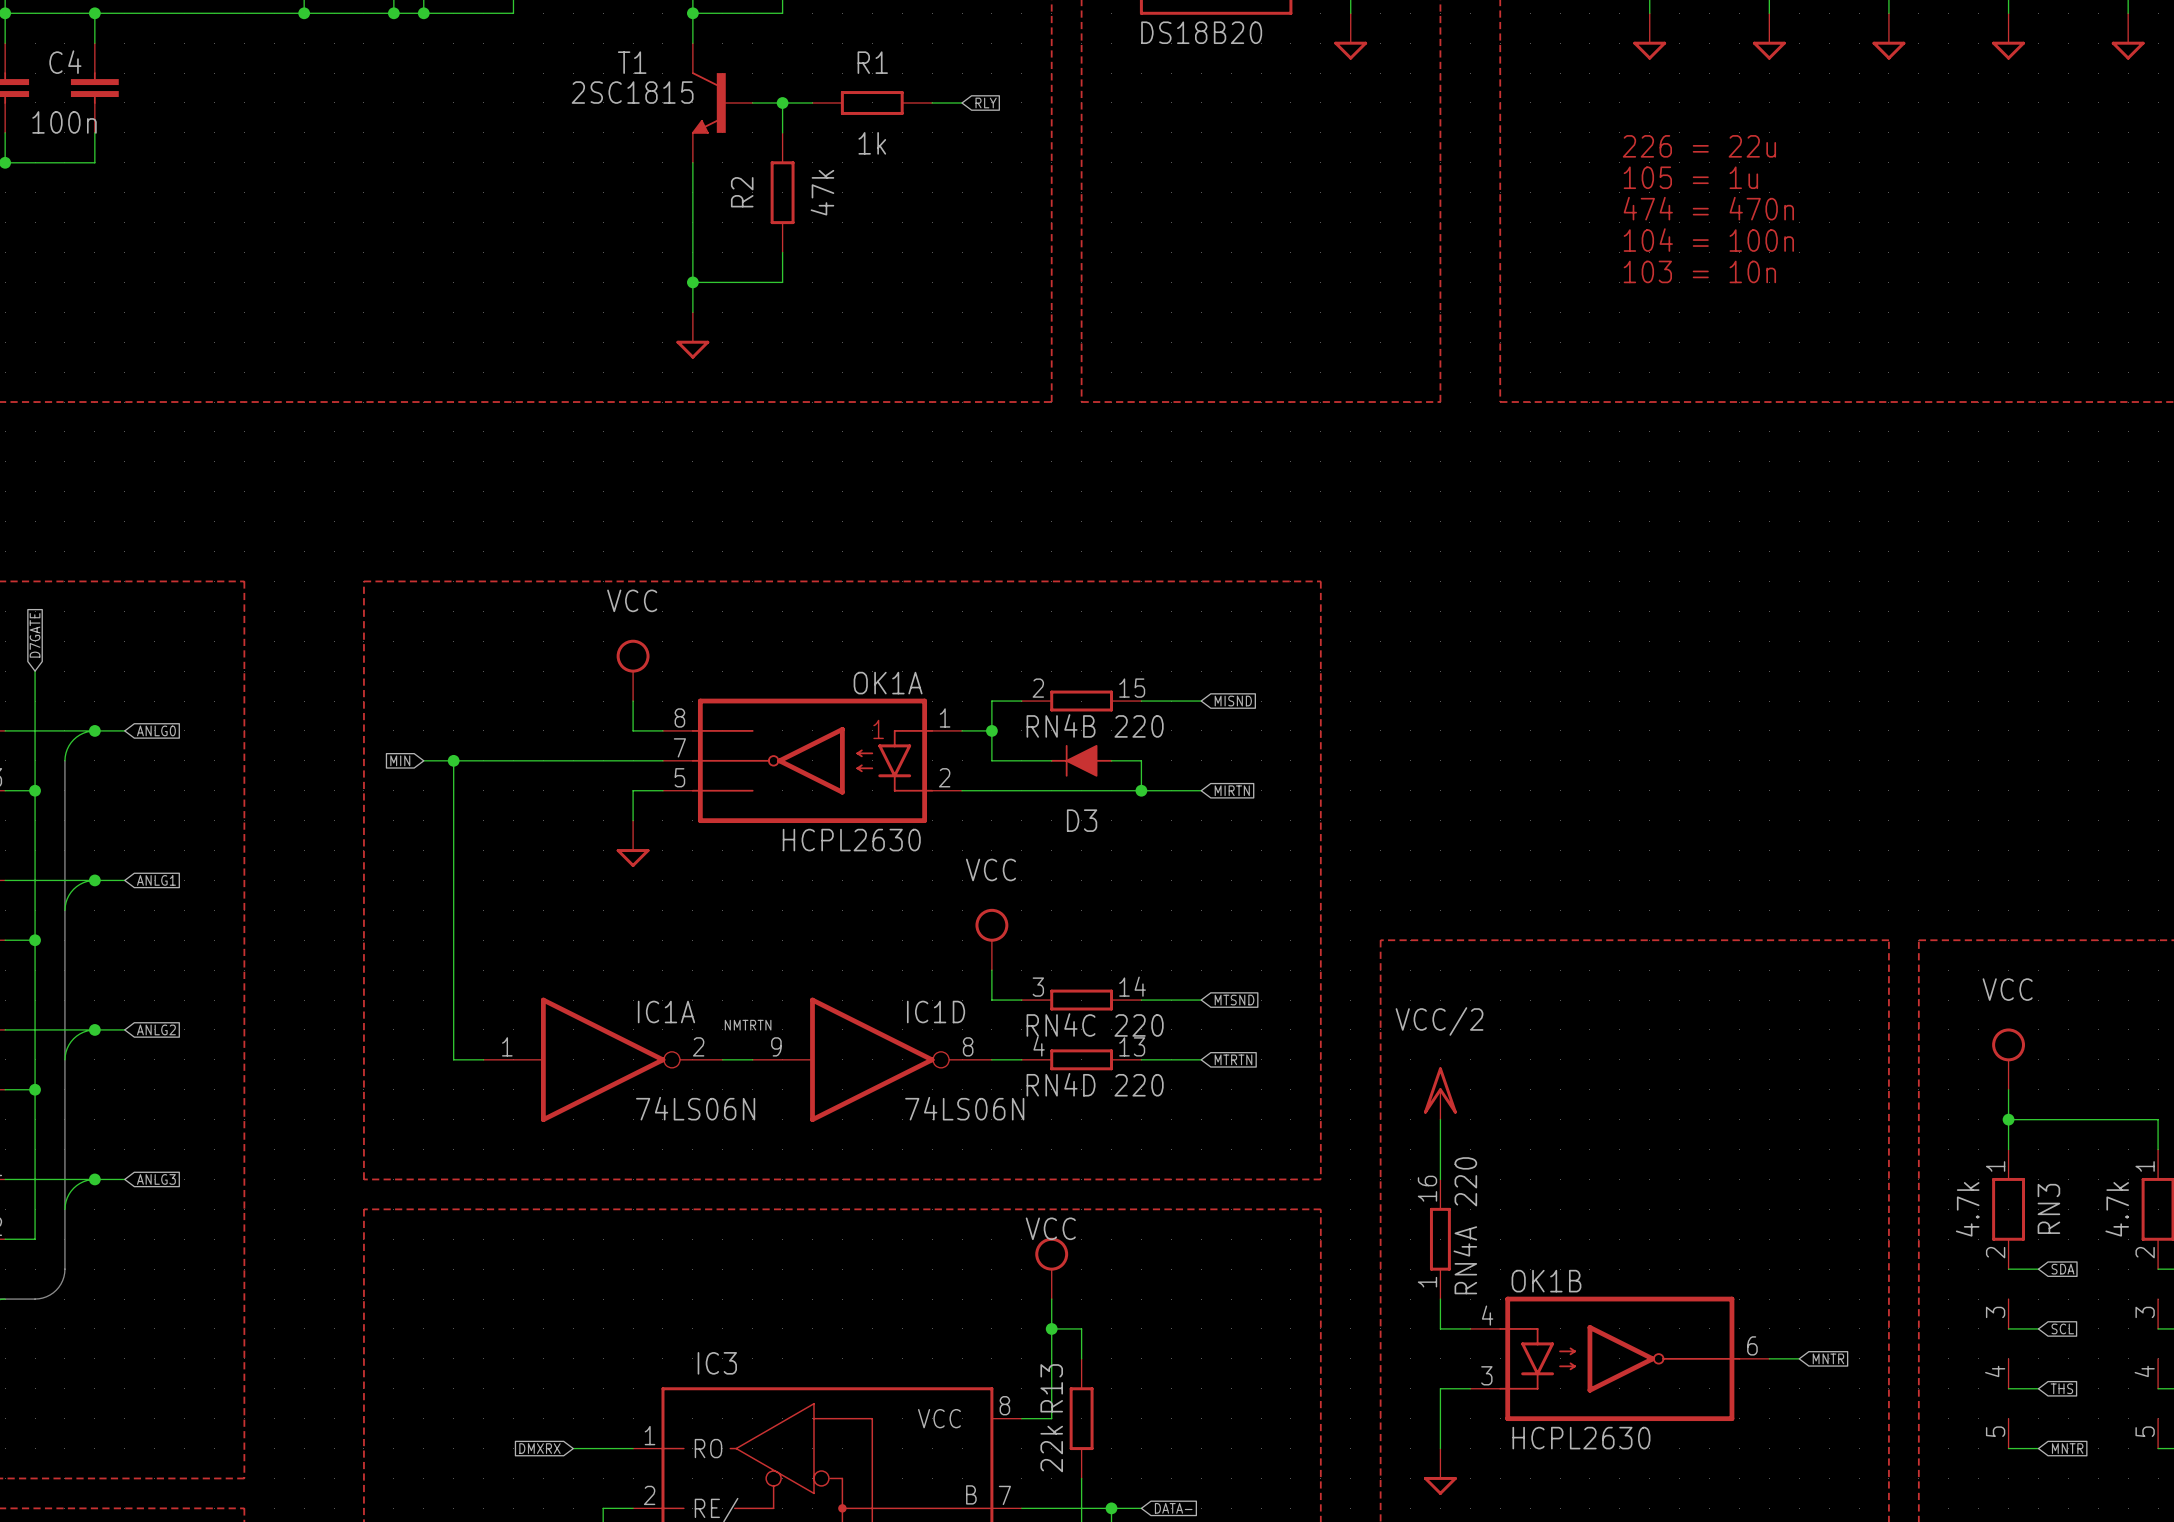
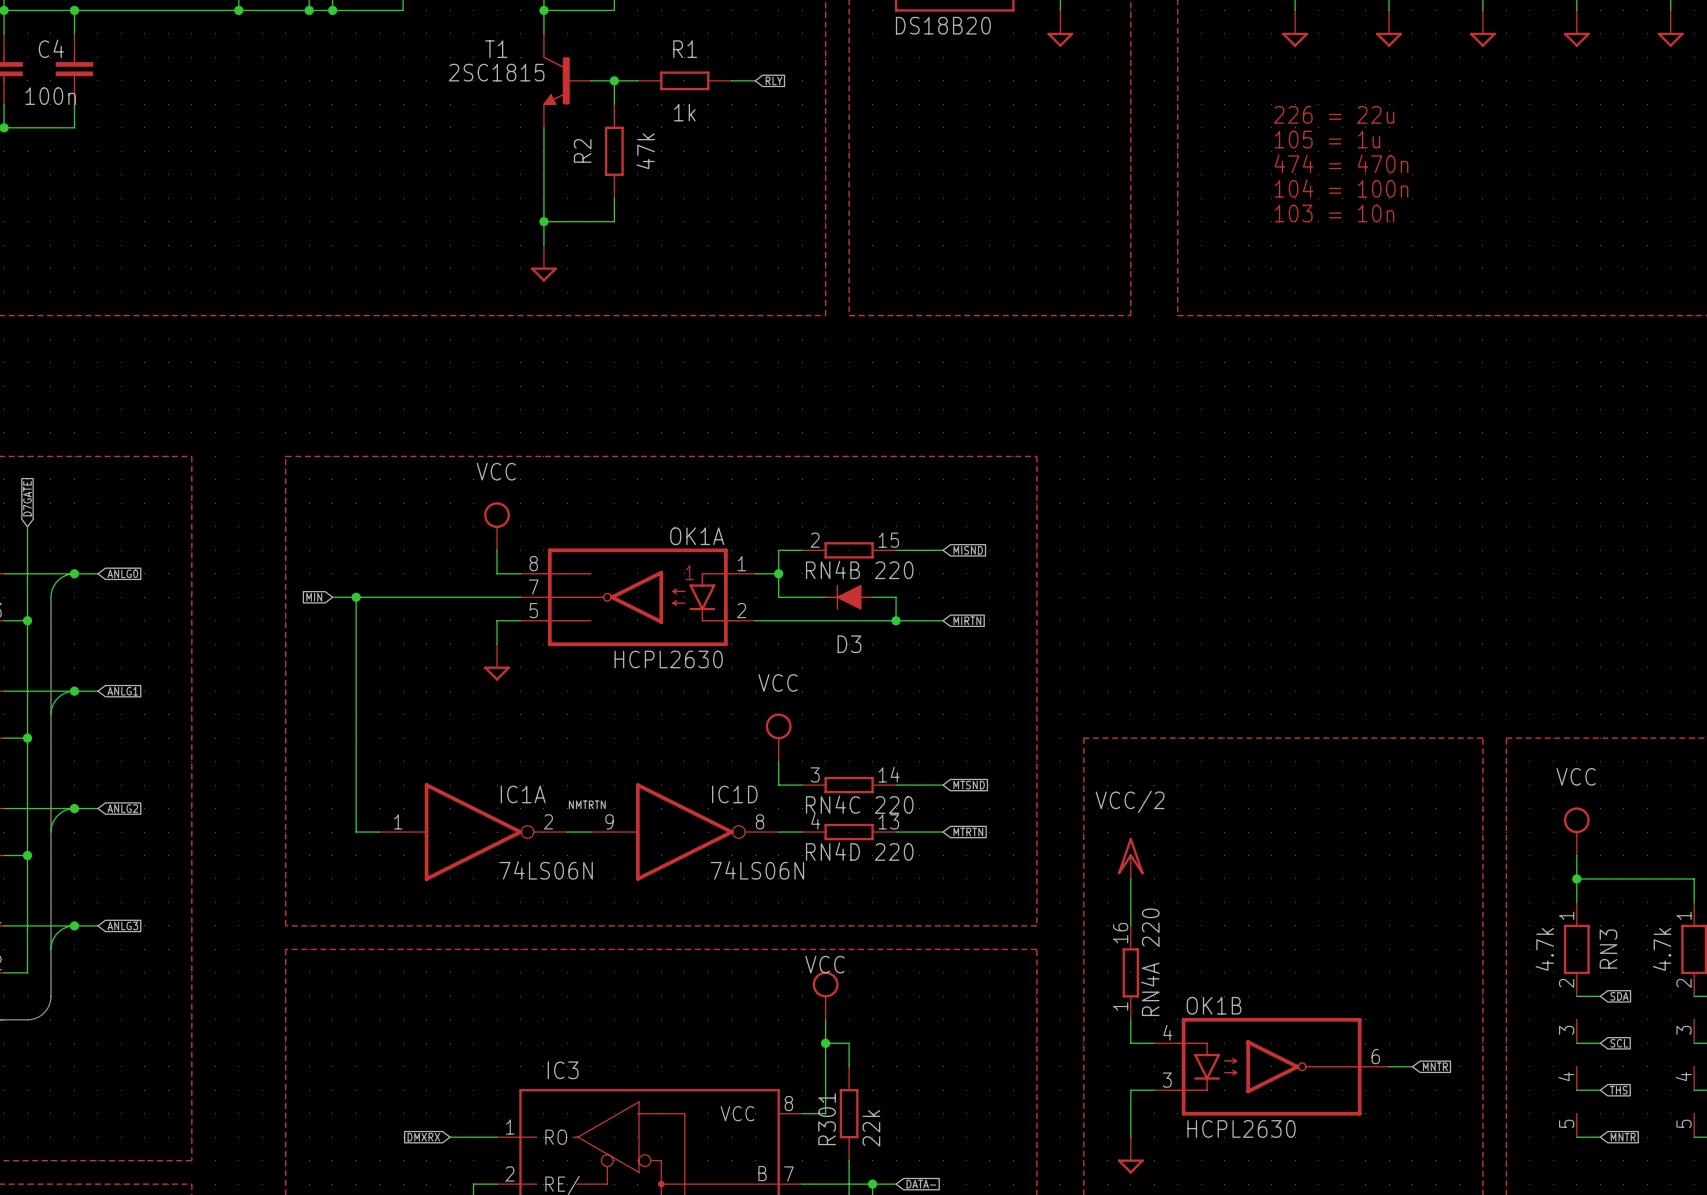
R13 name: R13 (1051, 1388) -> R301 (827, 1119)
R13 value position: 22k (1051, 1449) -> 22k (871, 1128)

